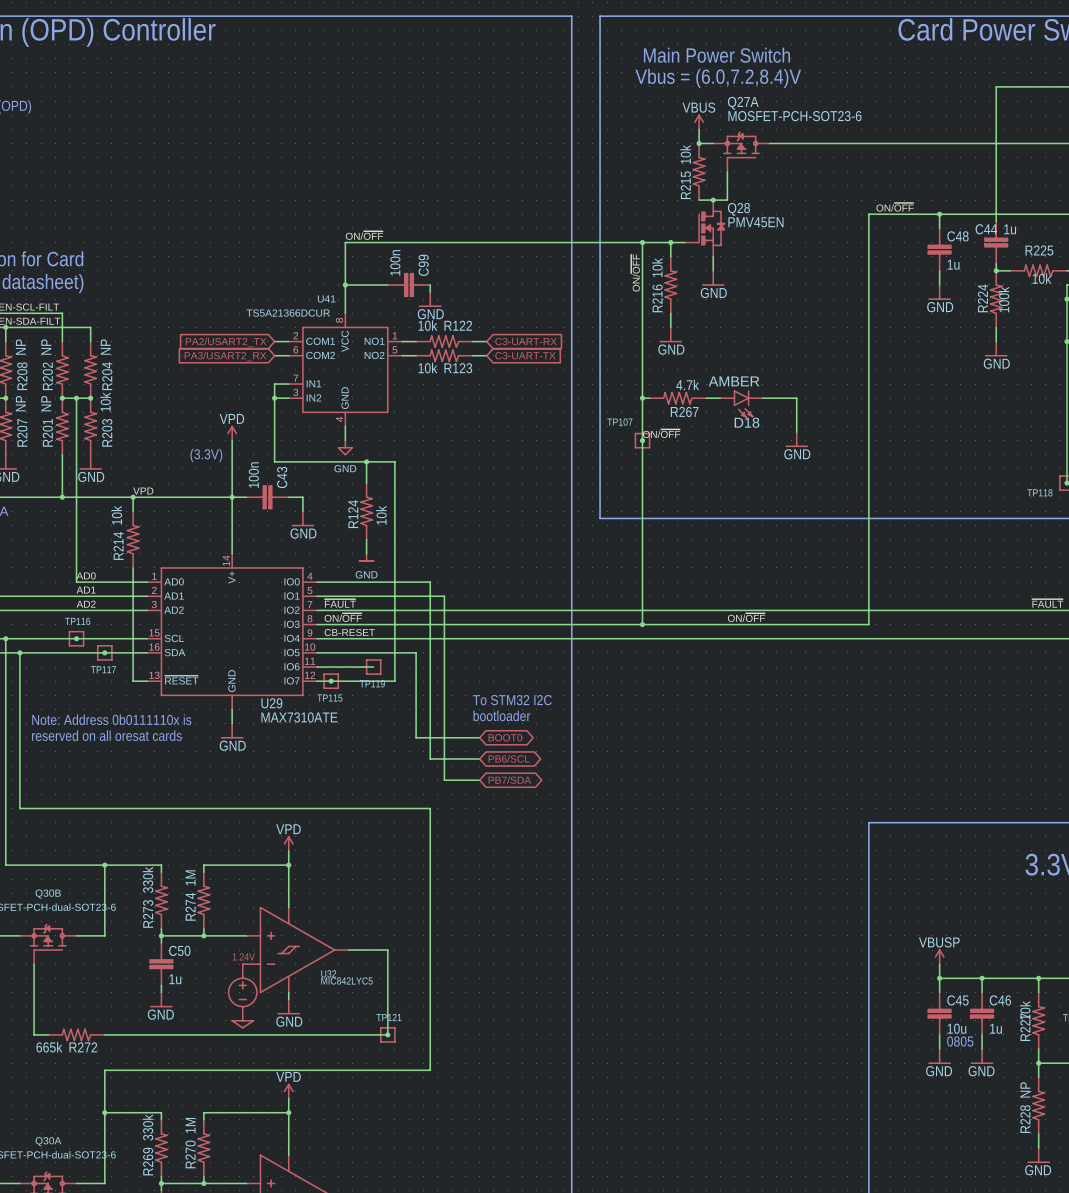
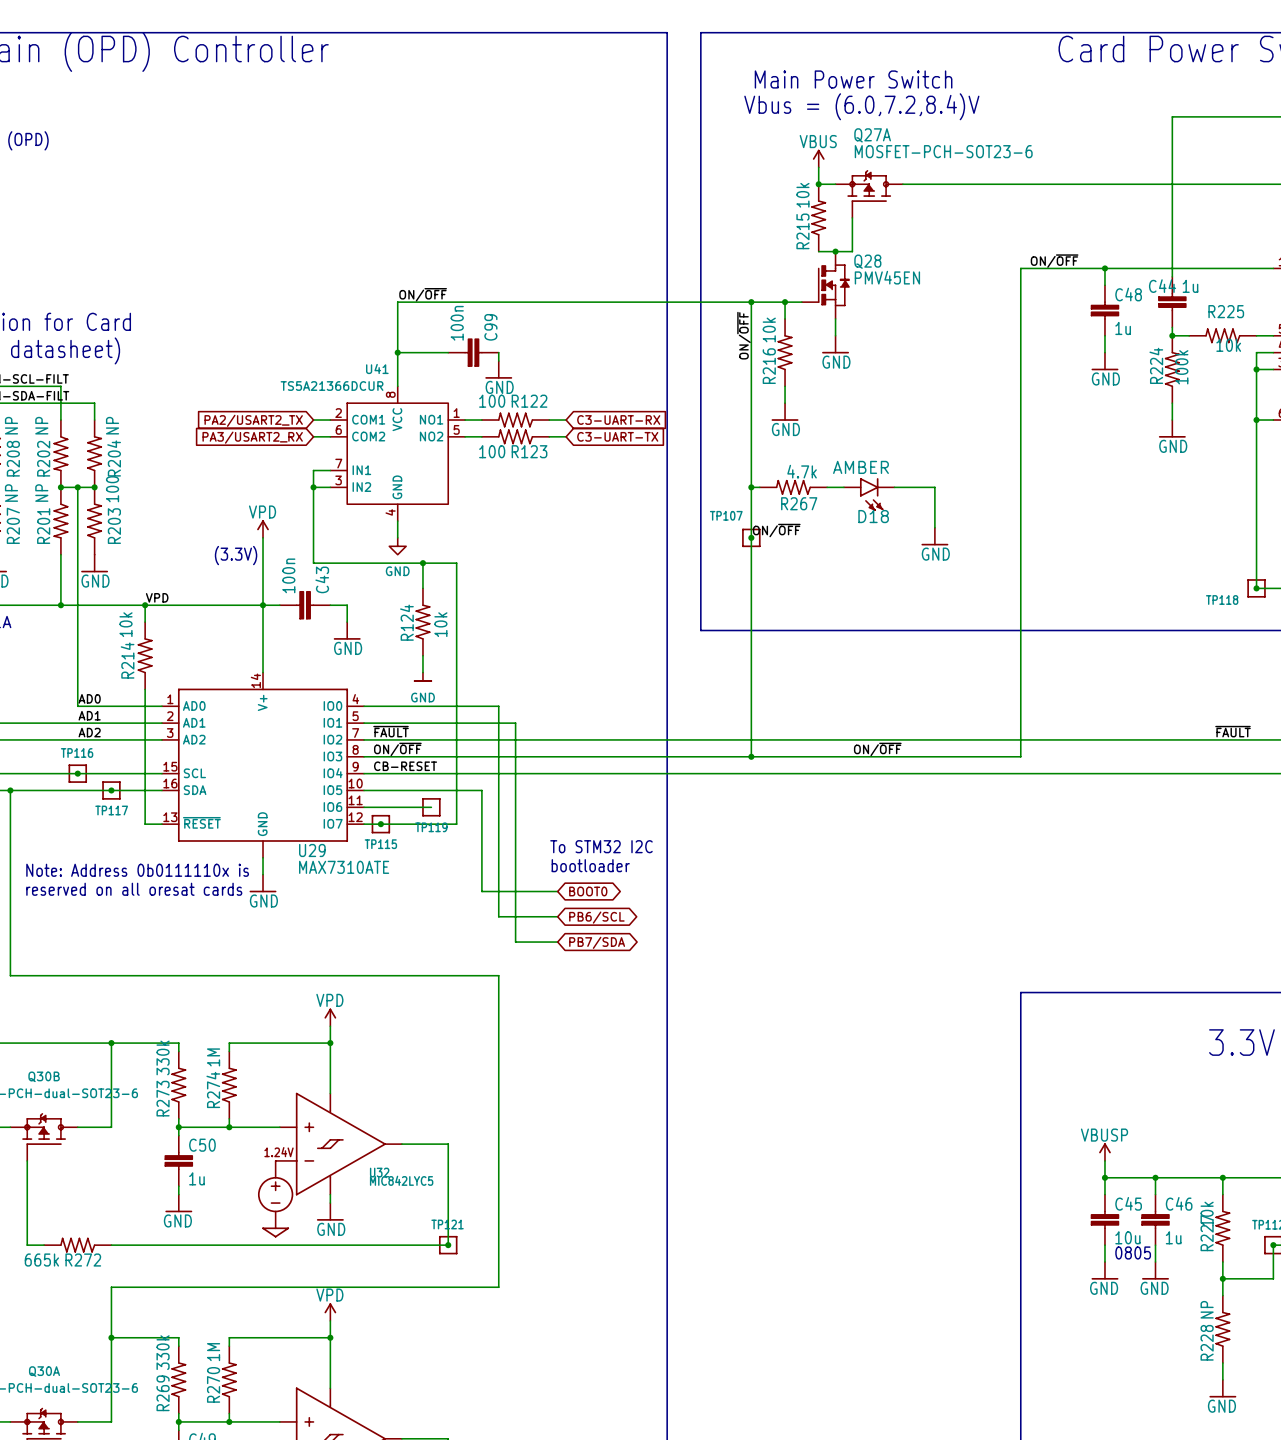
R122 value: 10k (427, 325) -> 100 (492, 401)
R123 value: 10k (427, 368) -> 100 (492, 451)
R203 value: 10k (105, 402) -> 100 (112, 489)

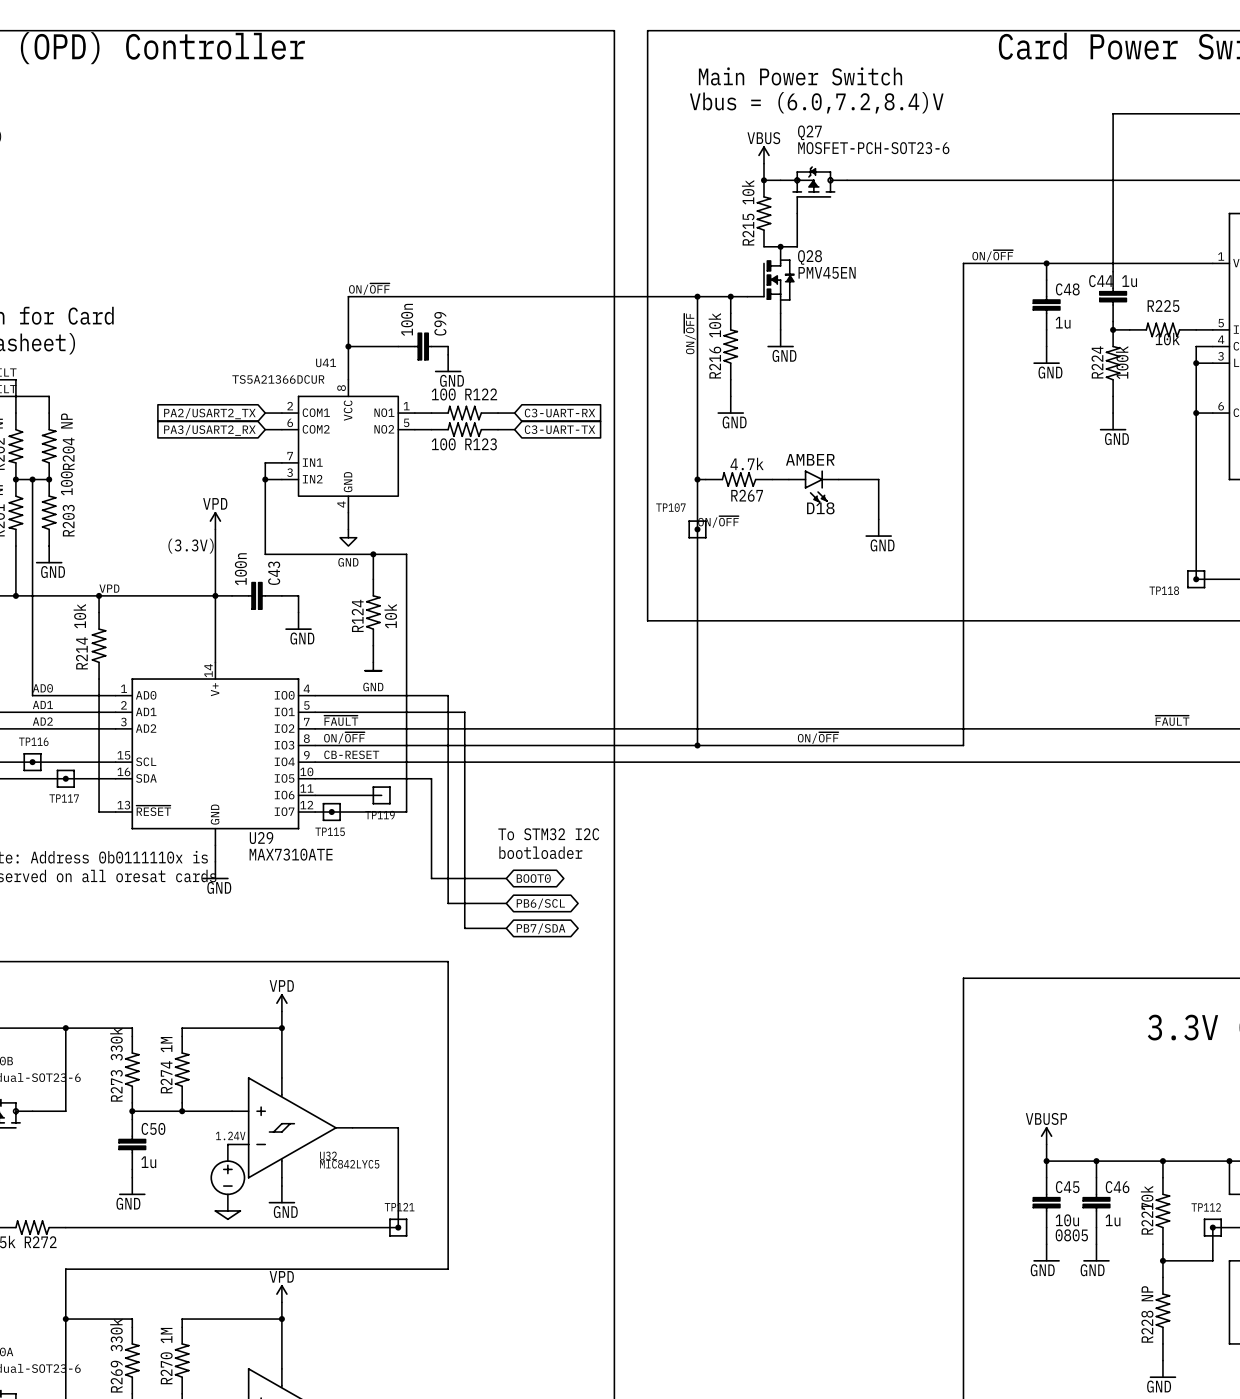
Q27A name: Q27A (872, 135) -> Q27 (809, 132)

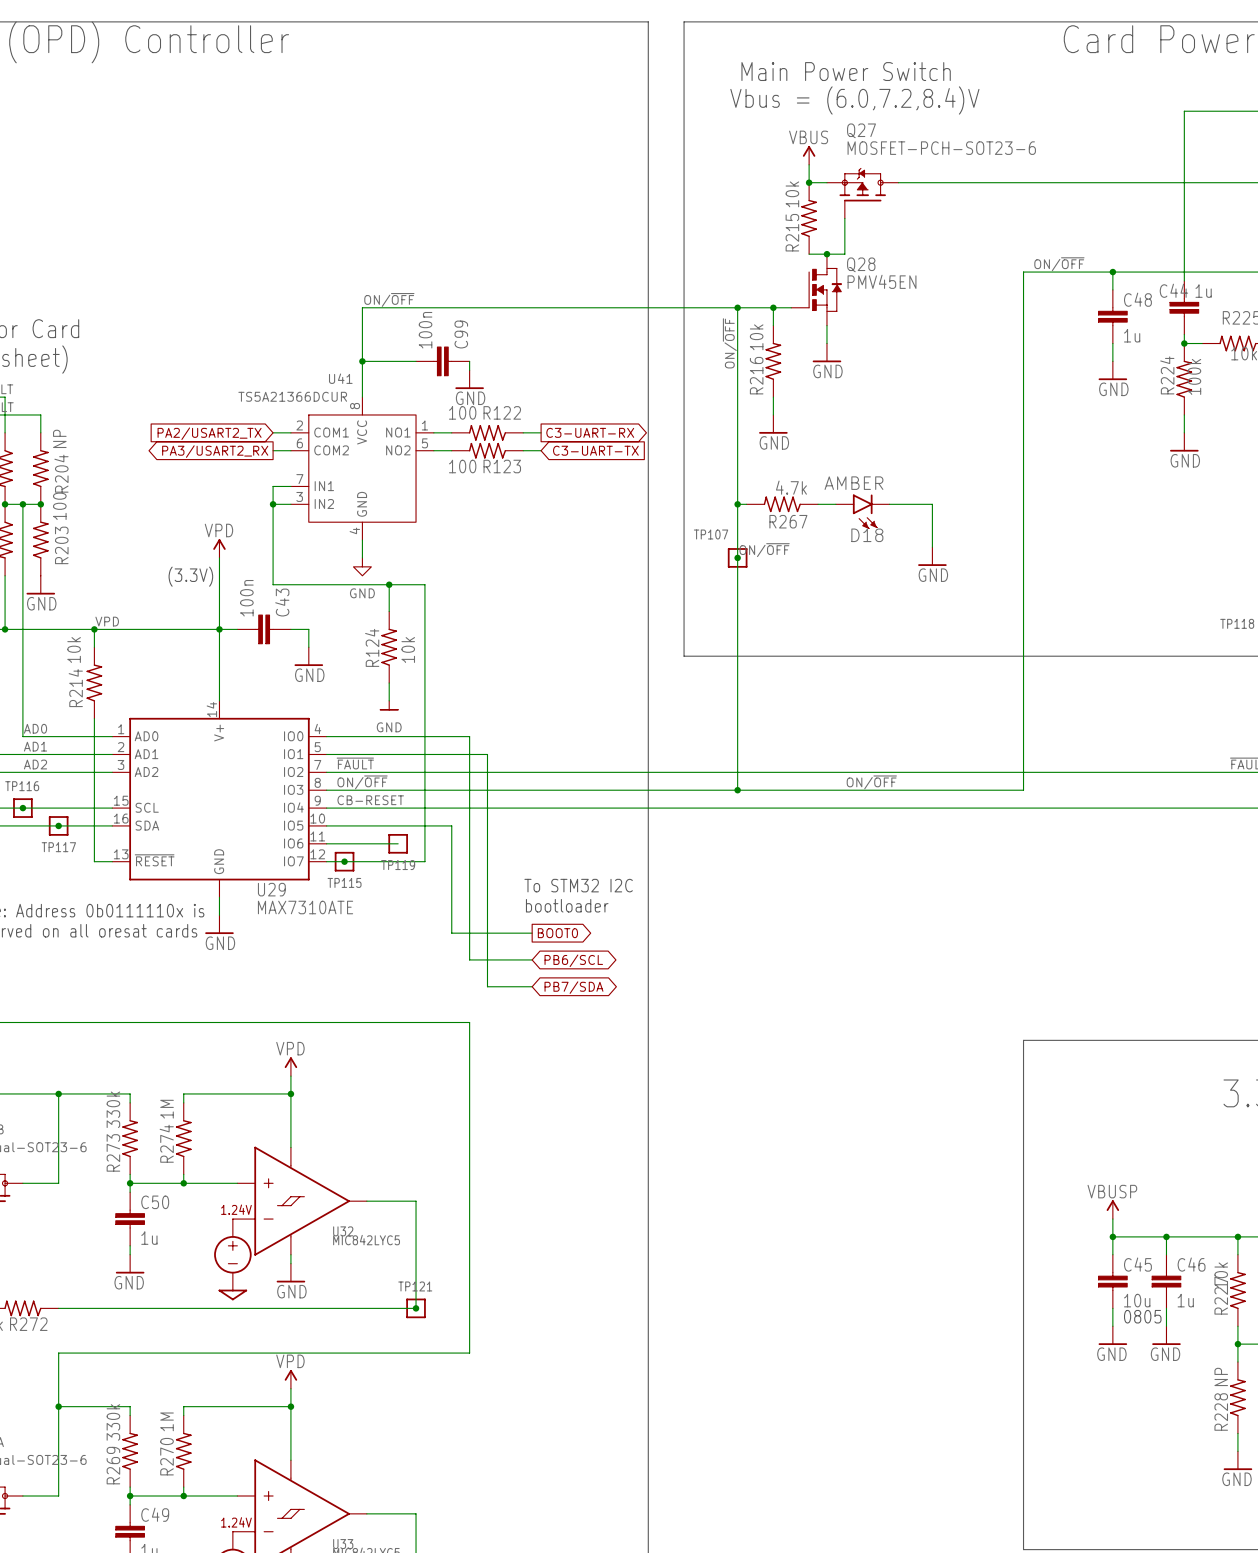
global label shape: input (559, 413) -> output (590, 432)
global label shape: input (209, 430) -> output (215, 451)
global label shape: bidirectional (533, 878) -> output (557, 933)

